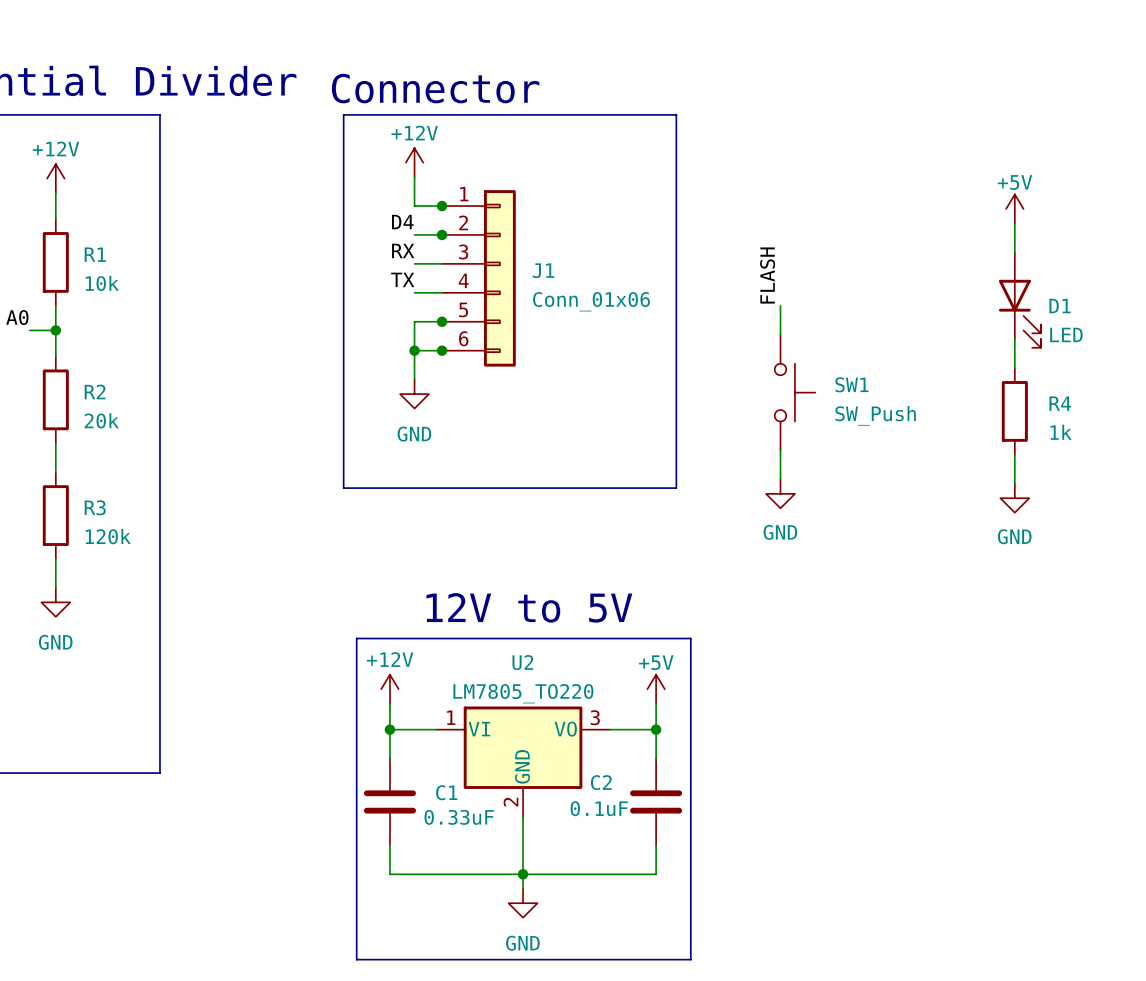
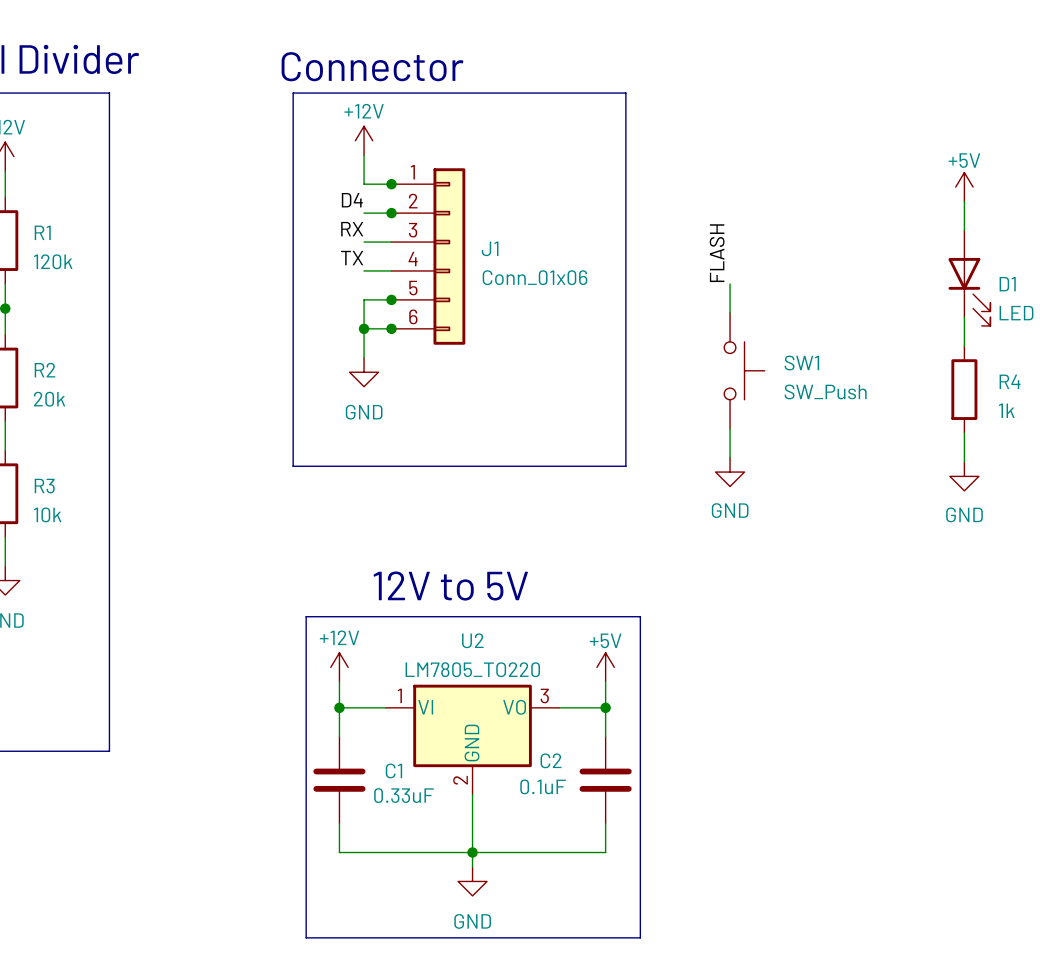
R1 value: 10k (102, 283) -> 120k (53, 261)
R3 value: 120k (108, 536) -> 10k (47, 514)

